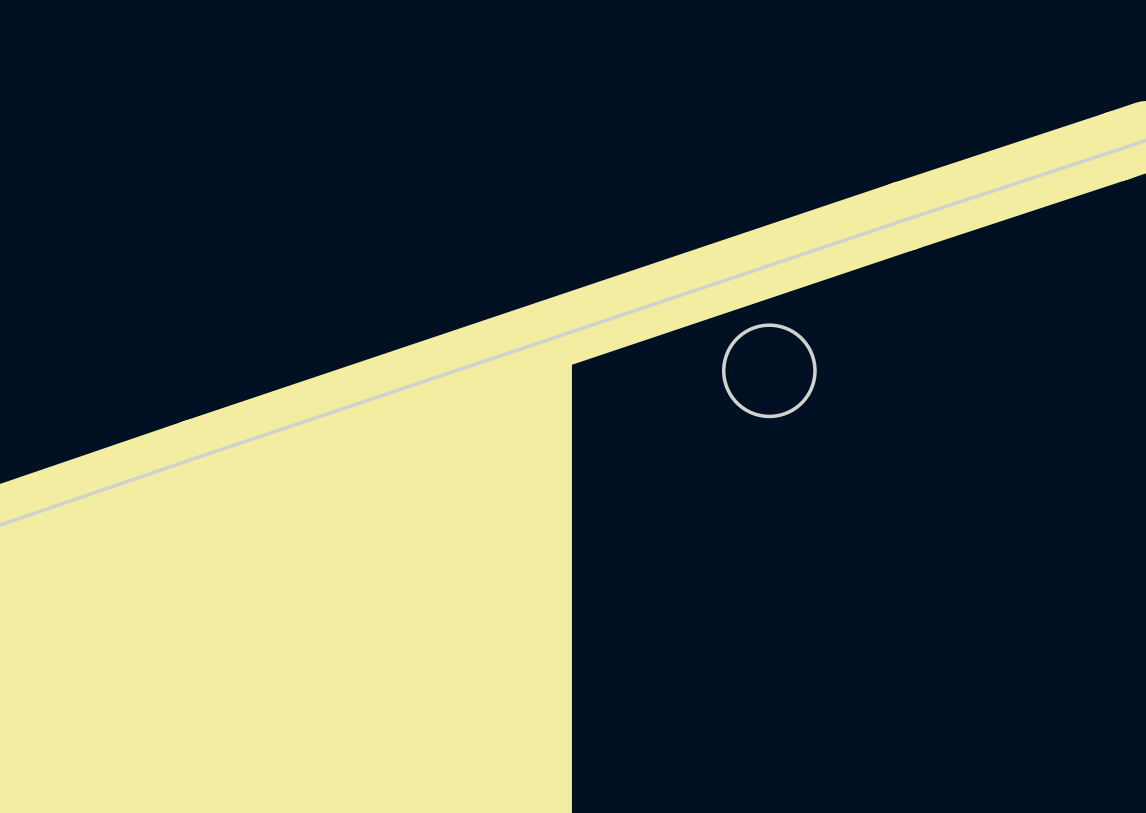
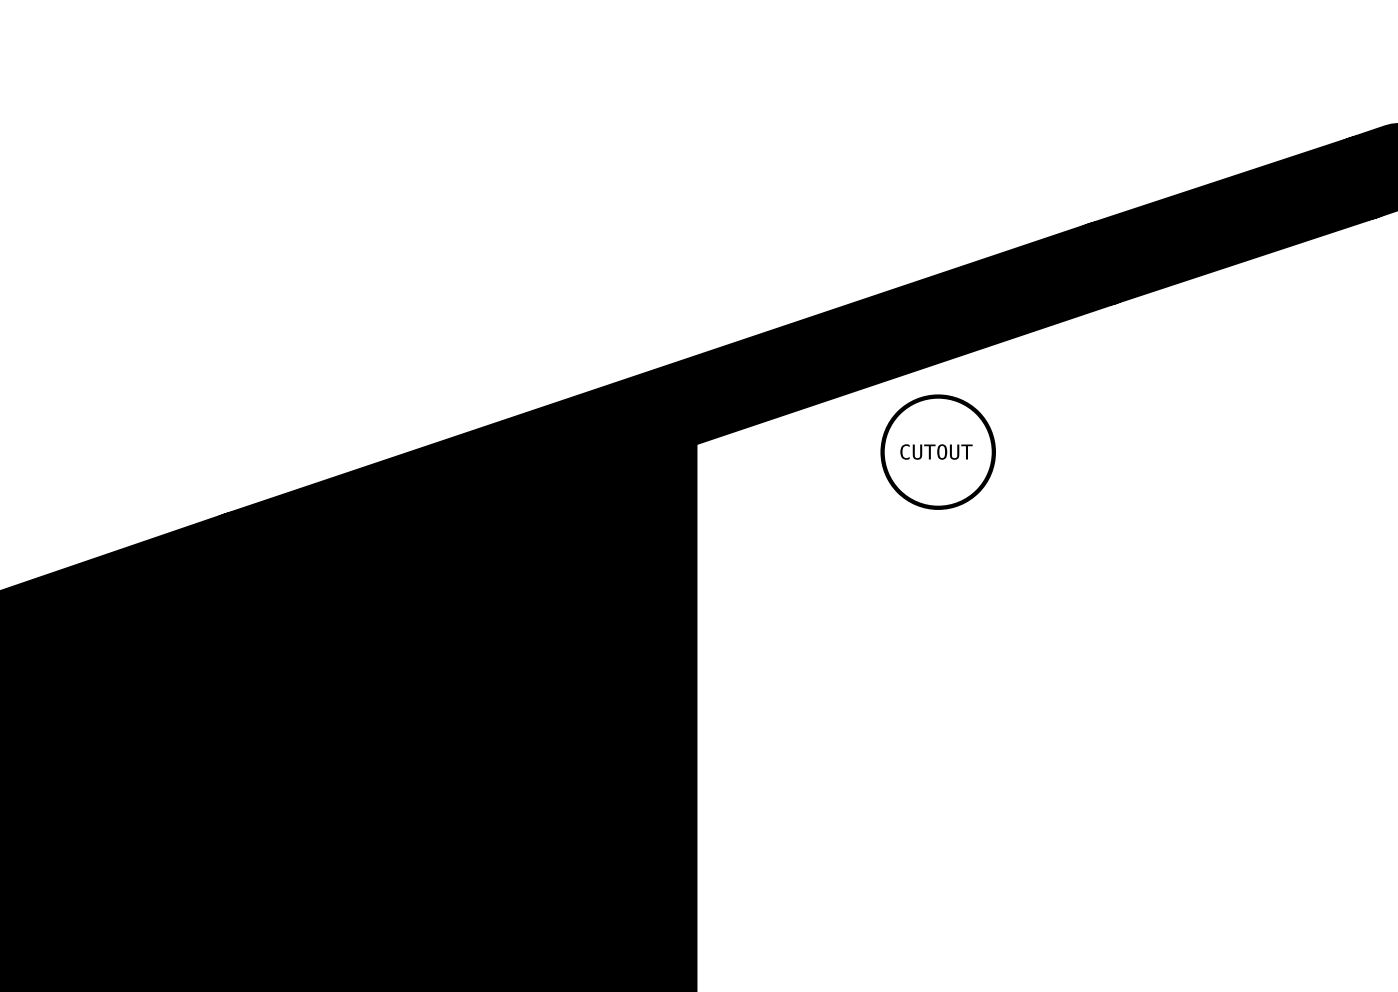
text: none -> CUTOUT (936, 452)

